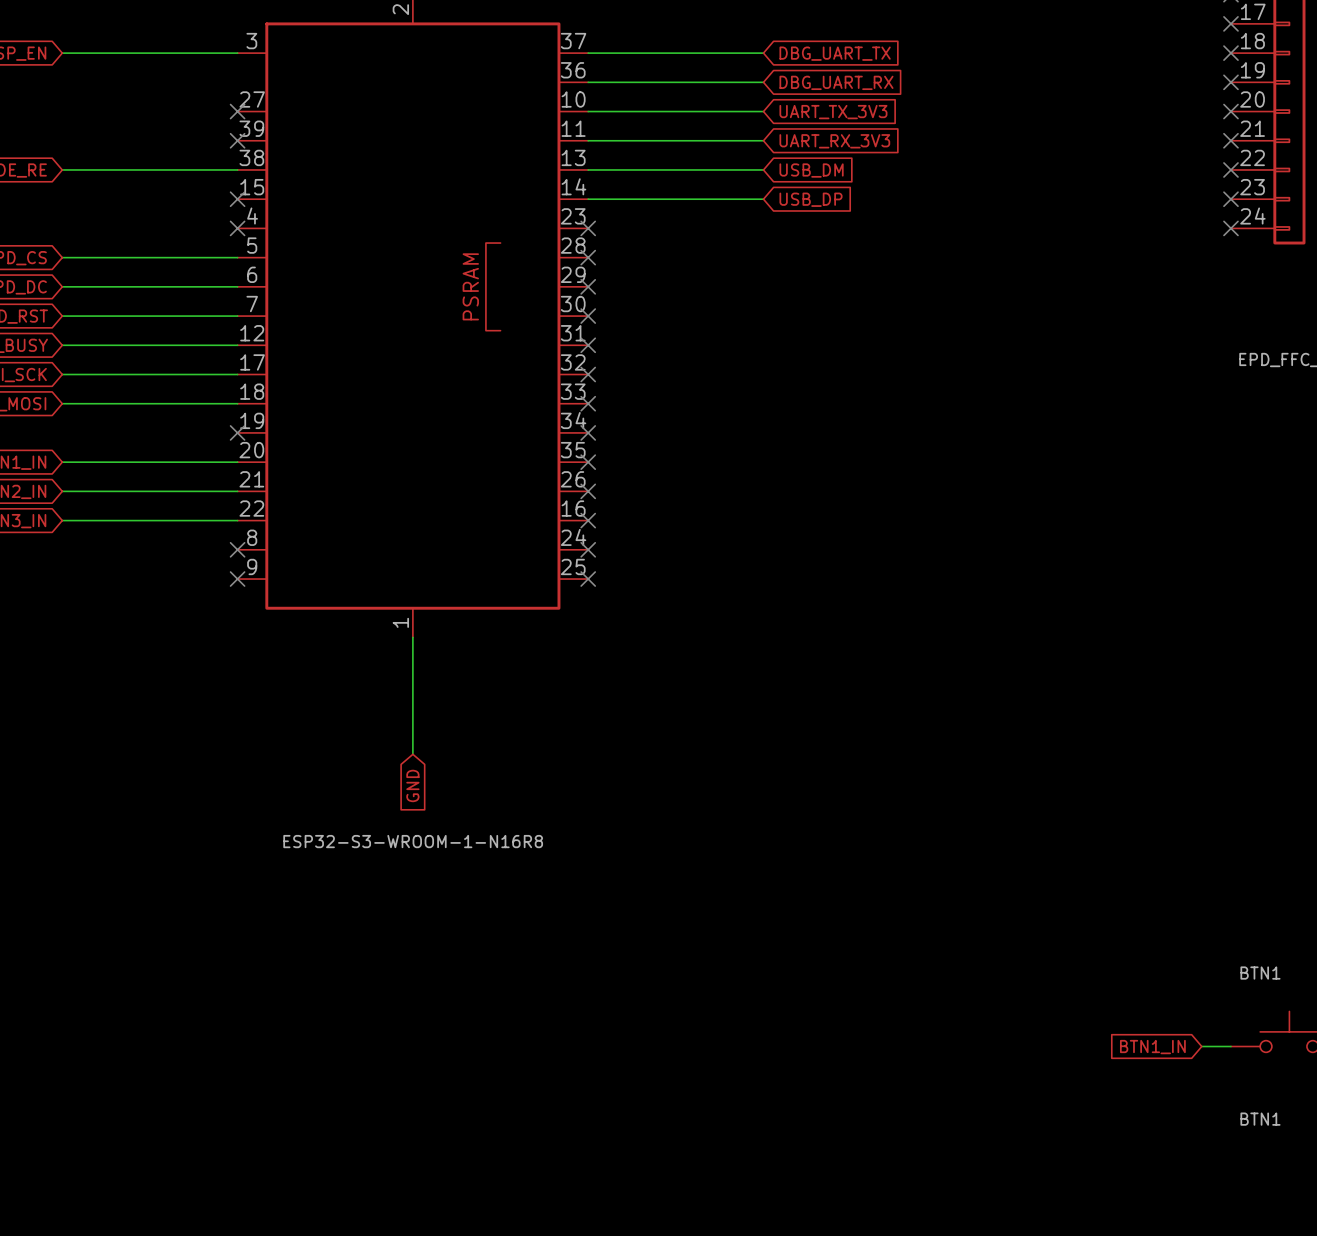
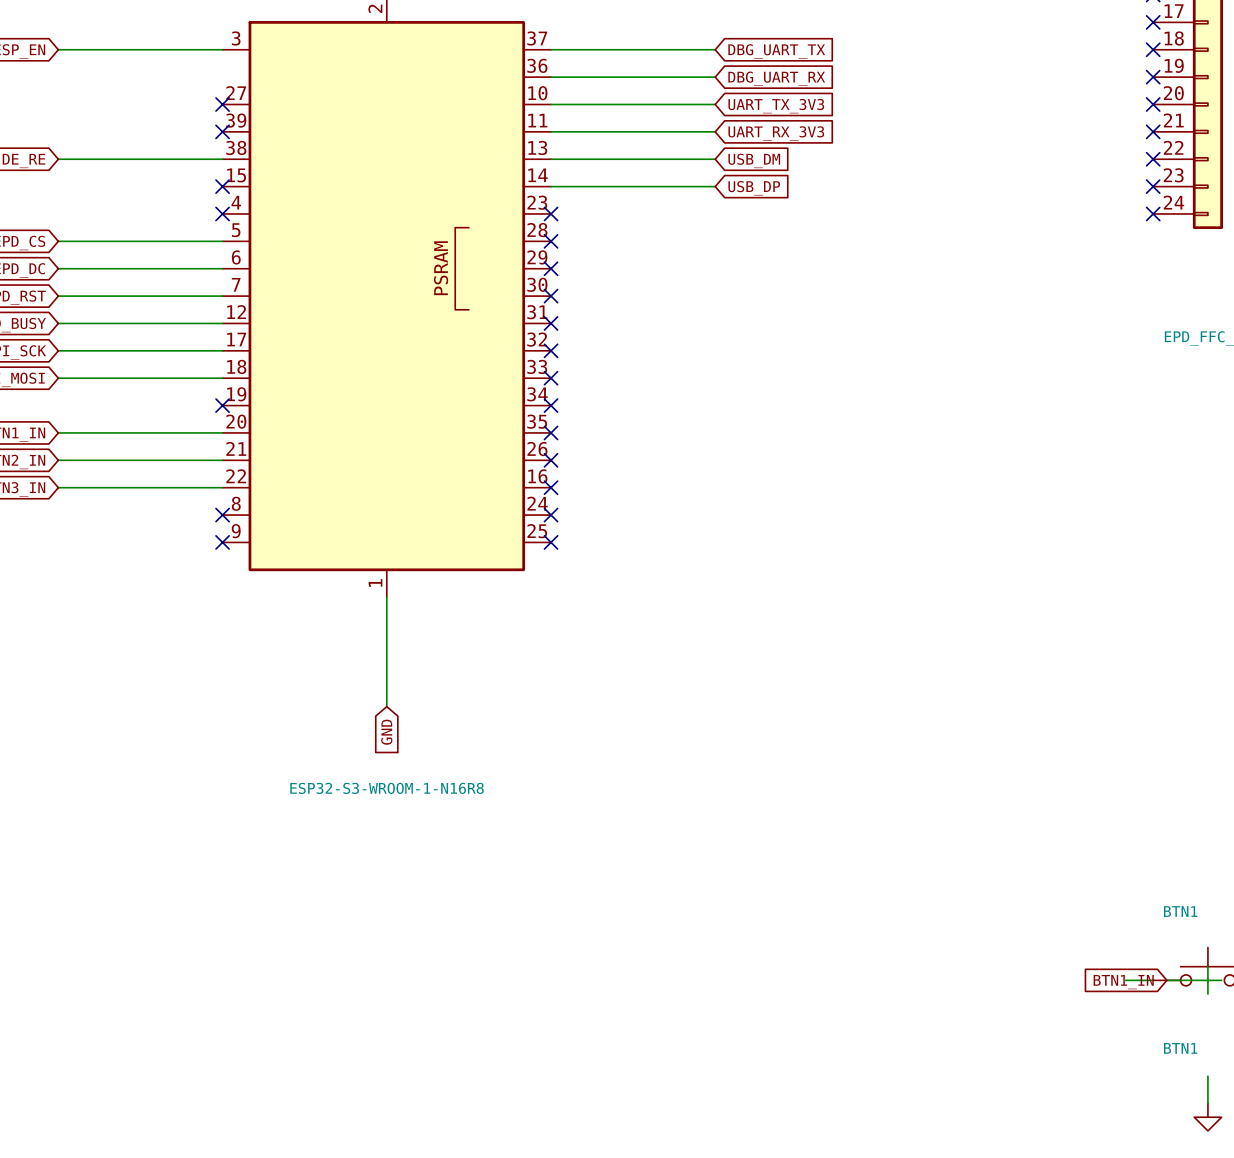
wire: none -> (1207, 966) (1207, 994)
wire: none -> (1166, 980) (1221, 980)
global label position: BTN1_IN (1152, 1047) -> BTN1_IN (1123, 982)
wire: none -> (1207, 1076) (1207, 1103)
power symbol: none -> (1207, 1117)

